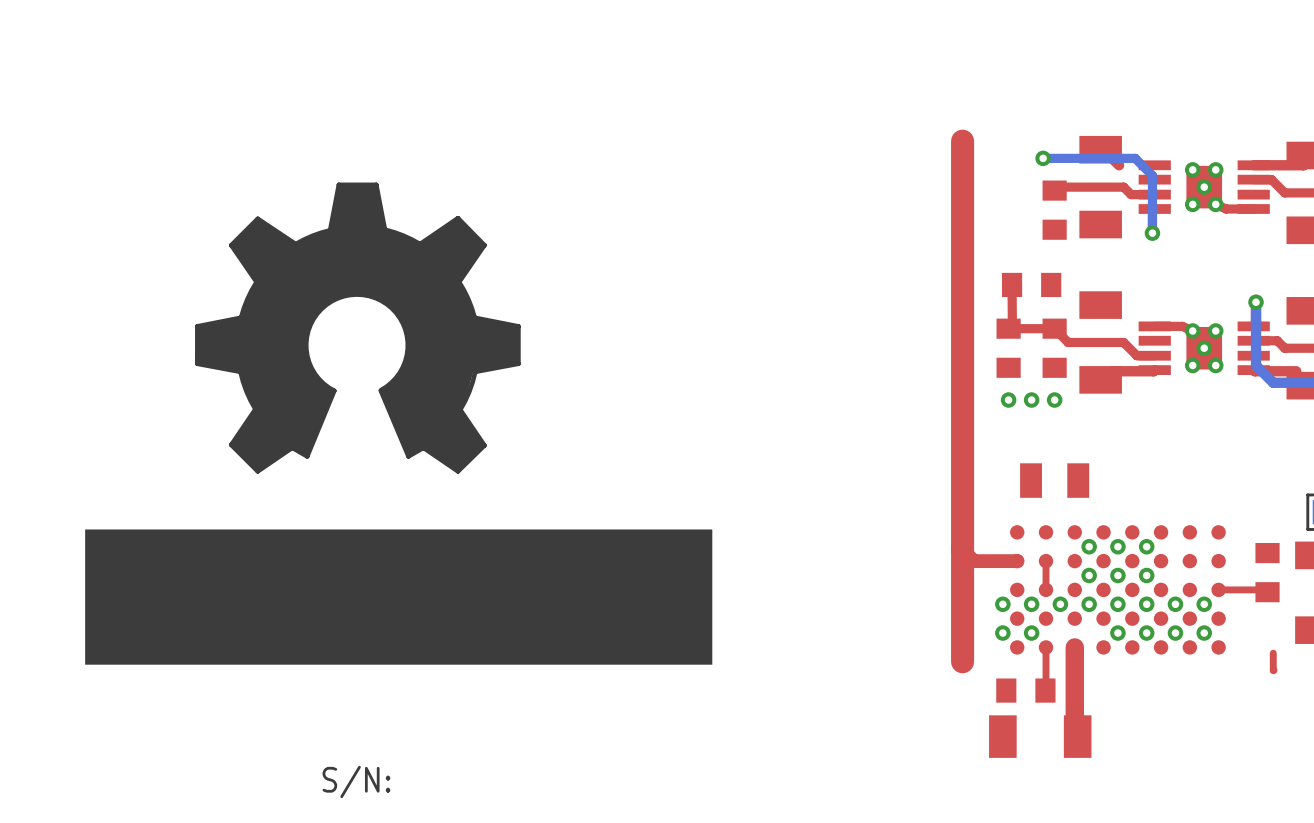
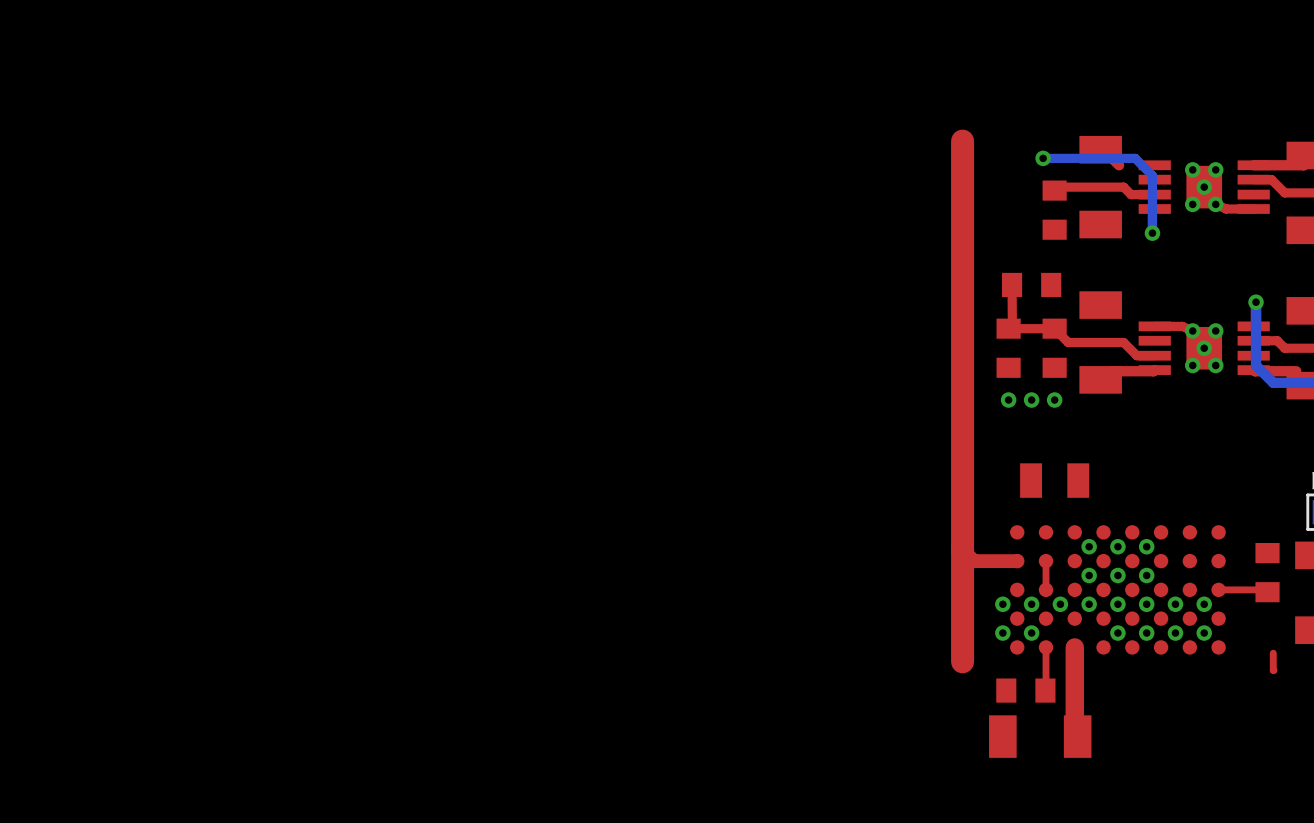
drawing: [195, 182, 521, 474] -> none
drawing: [85, 529, 713, 665] -> none
text: S/N: (356, 781) -> none

